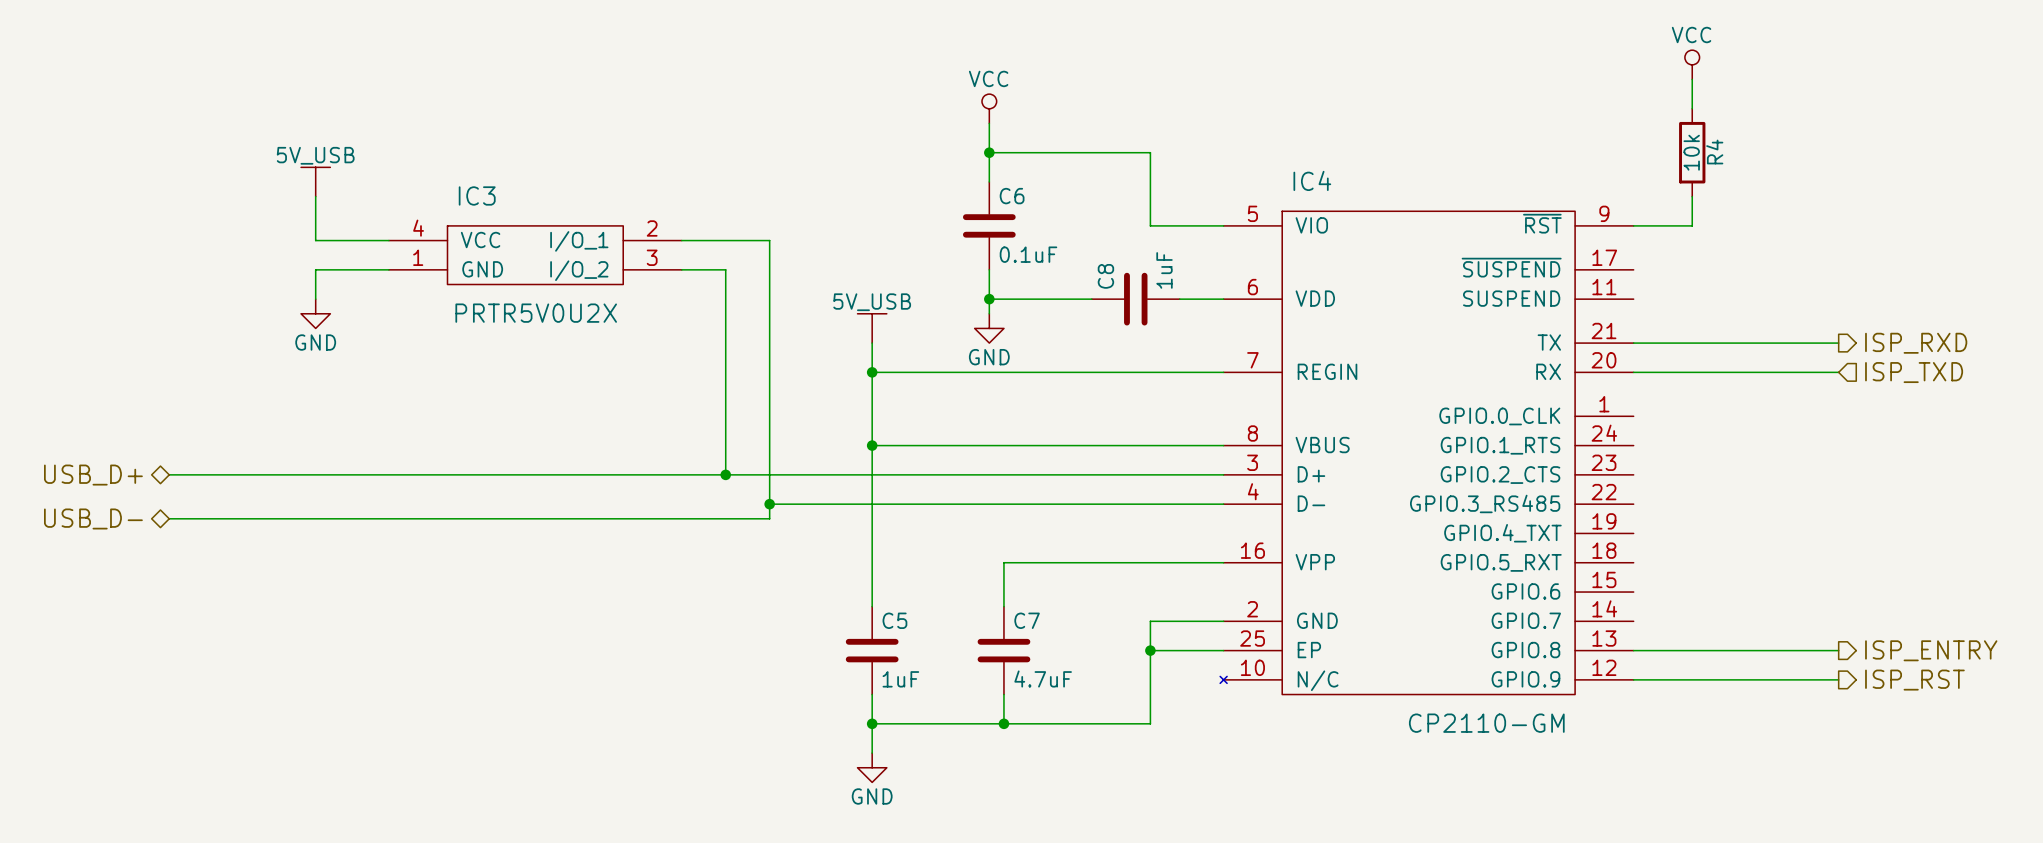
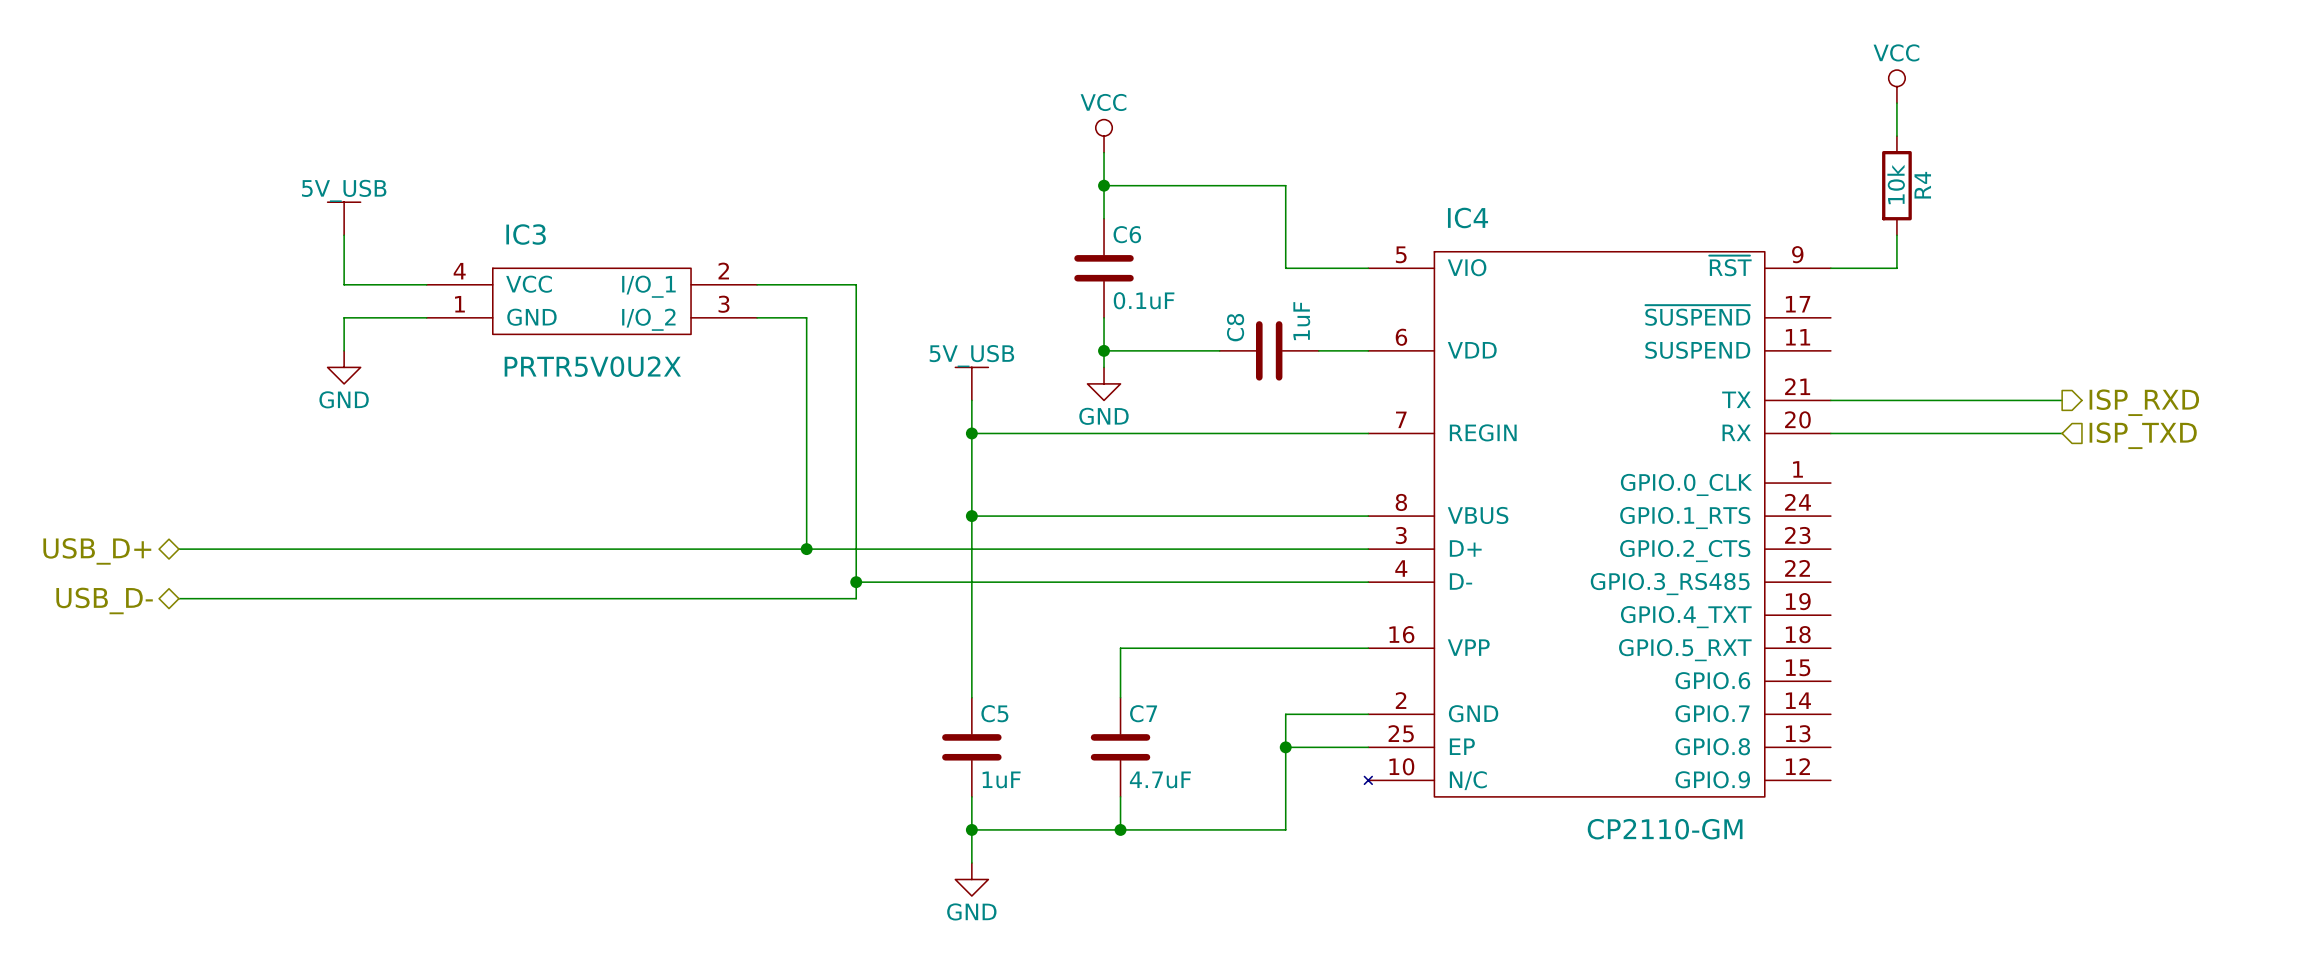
wire: (1633, 650) (1838, 650) -> none
hierarchical label: ISP_ENTRY (1931, 650) -> none
wire: (1633, 679) (1838, 679) -> none
hierarchical label: ISP_RST (1914, 680) -> none

